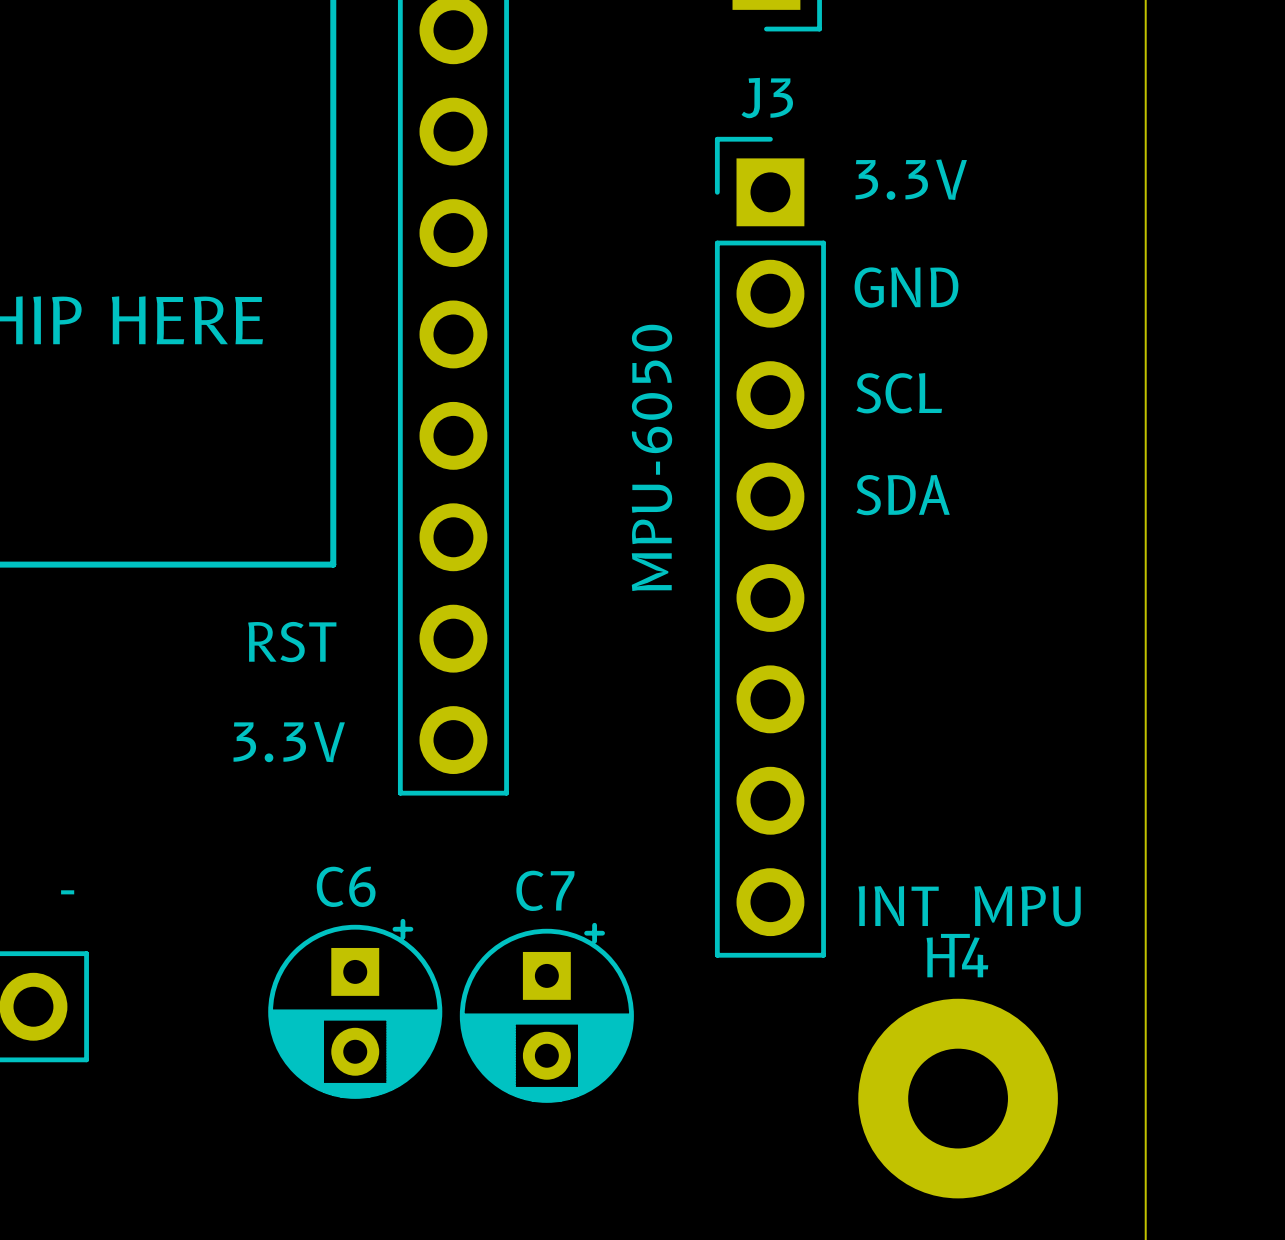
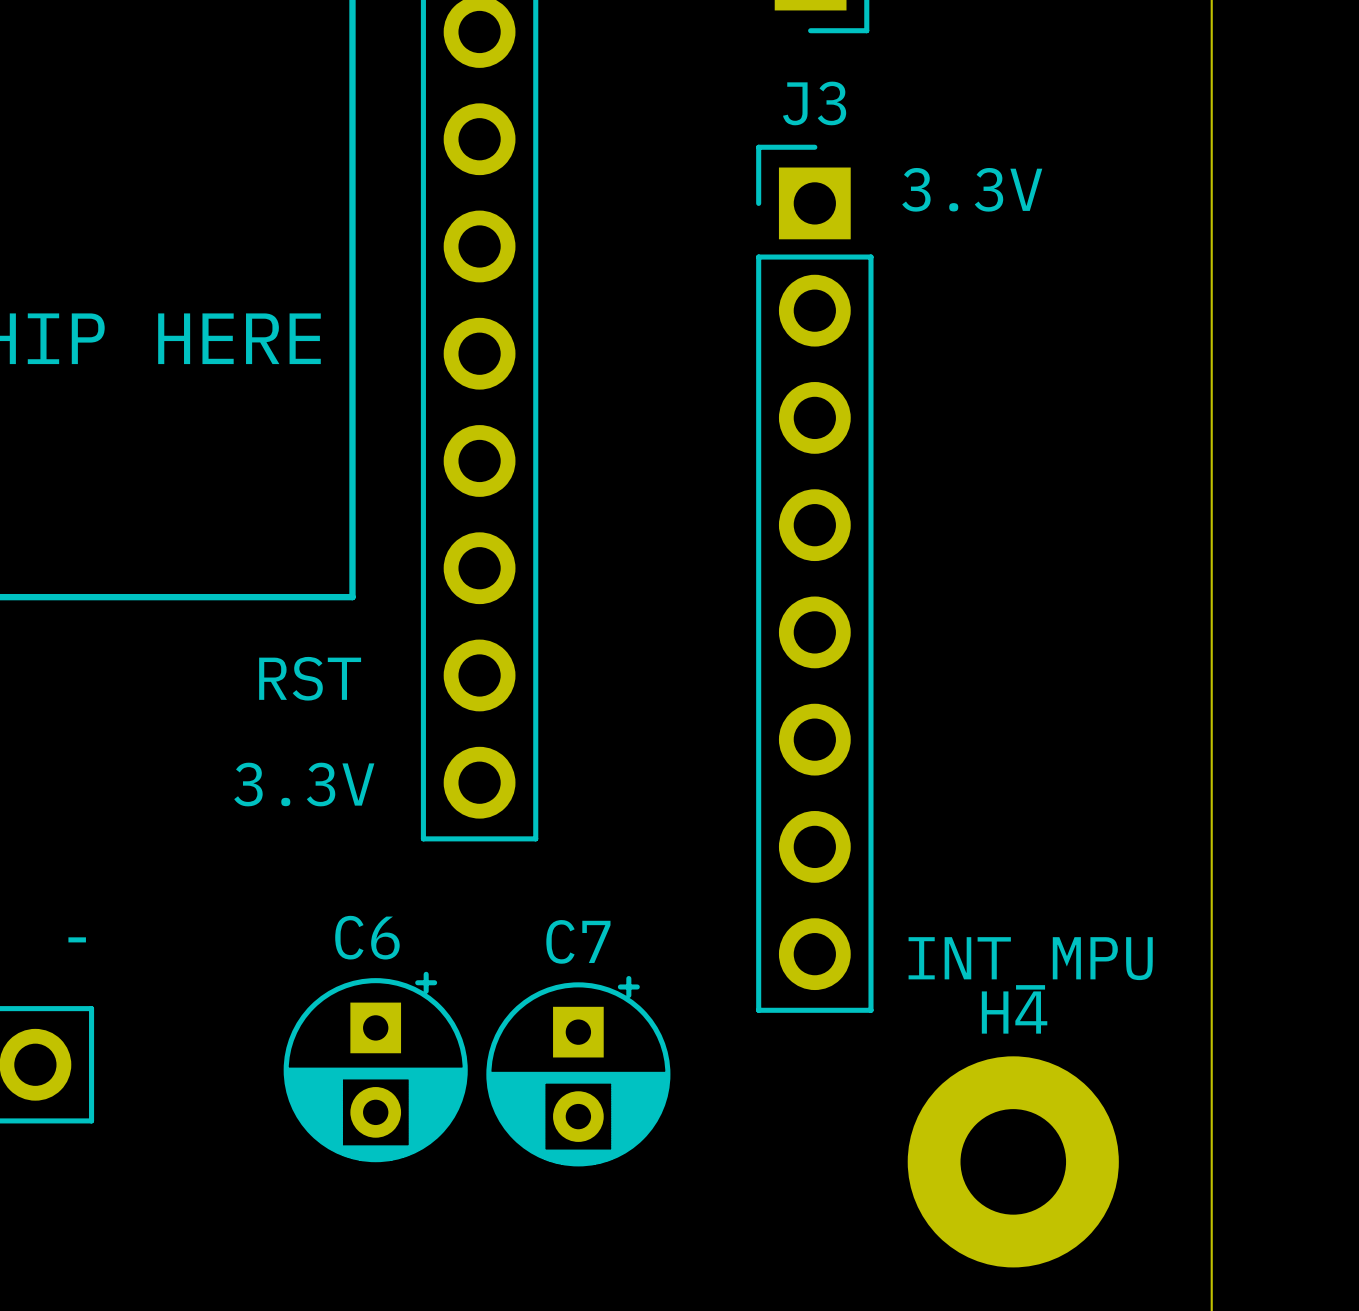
text: GND (906, 287) -> none
text: SCL (899, 393) -> none
text: MPU-6050 (651, 457) -> none
text: SDA (903, 495) -> none

